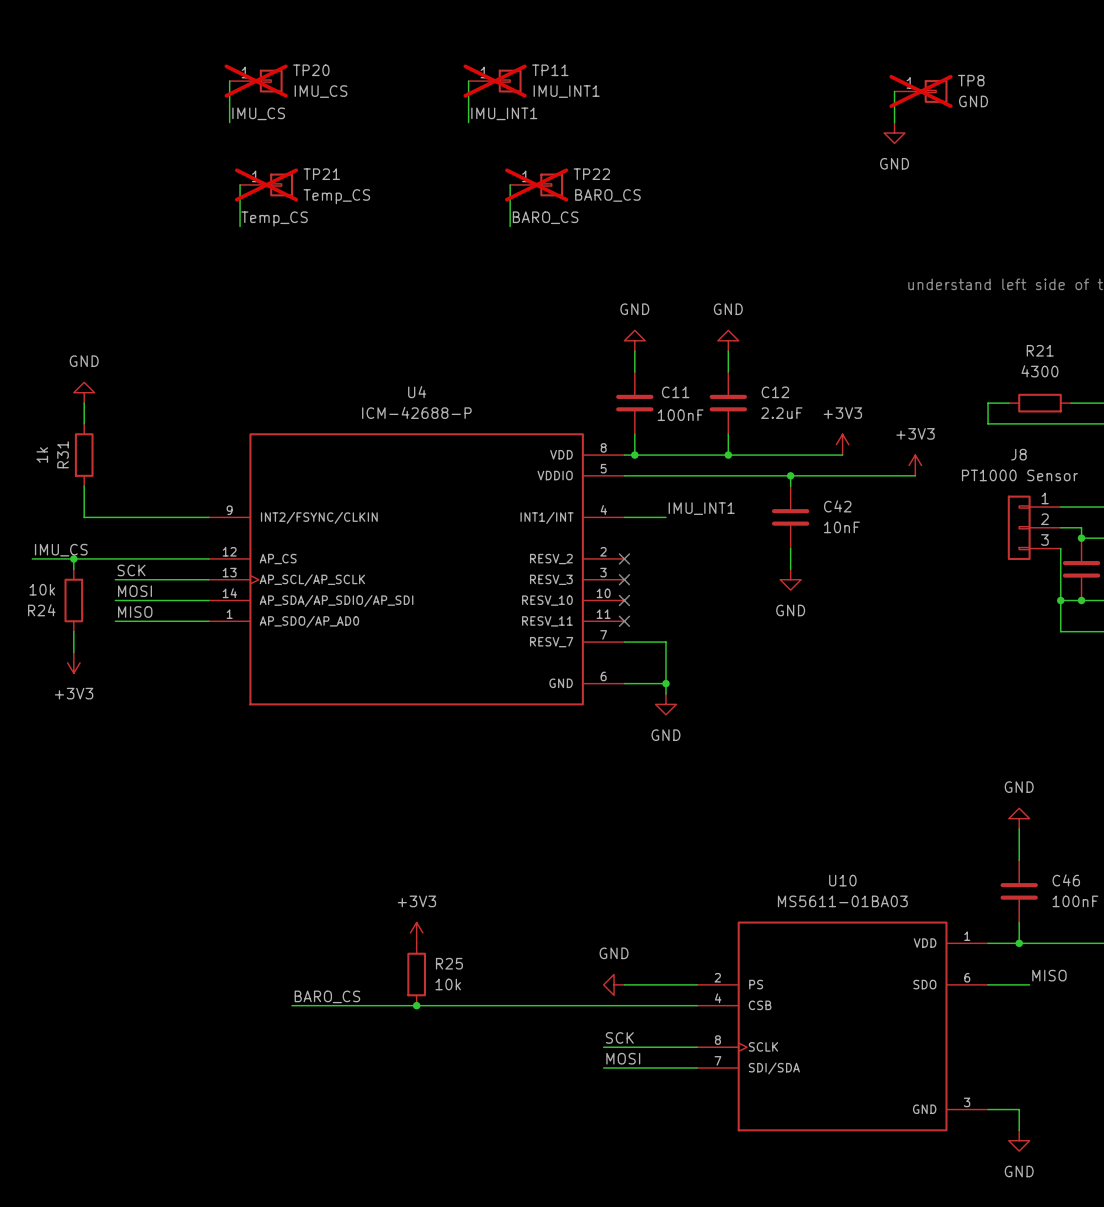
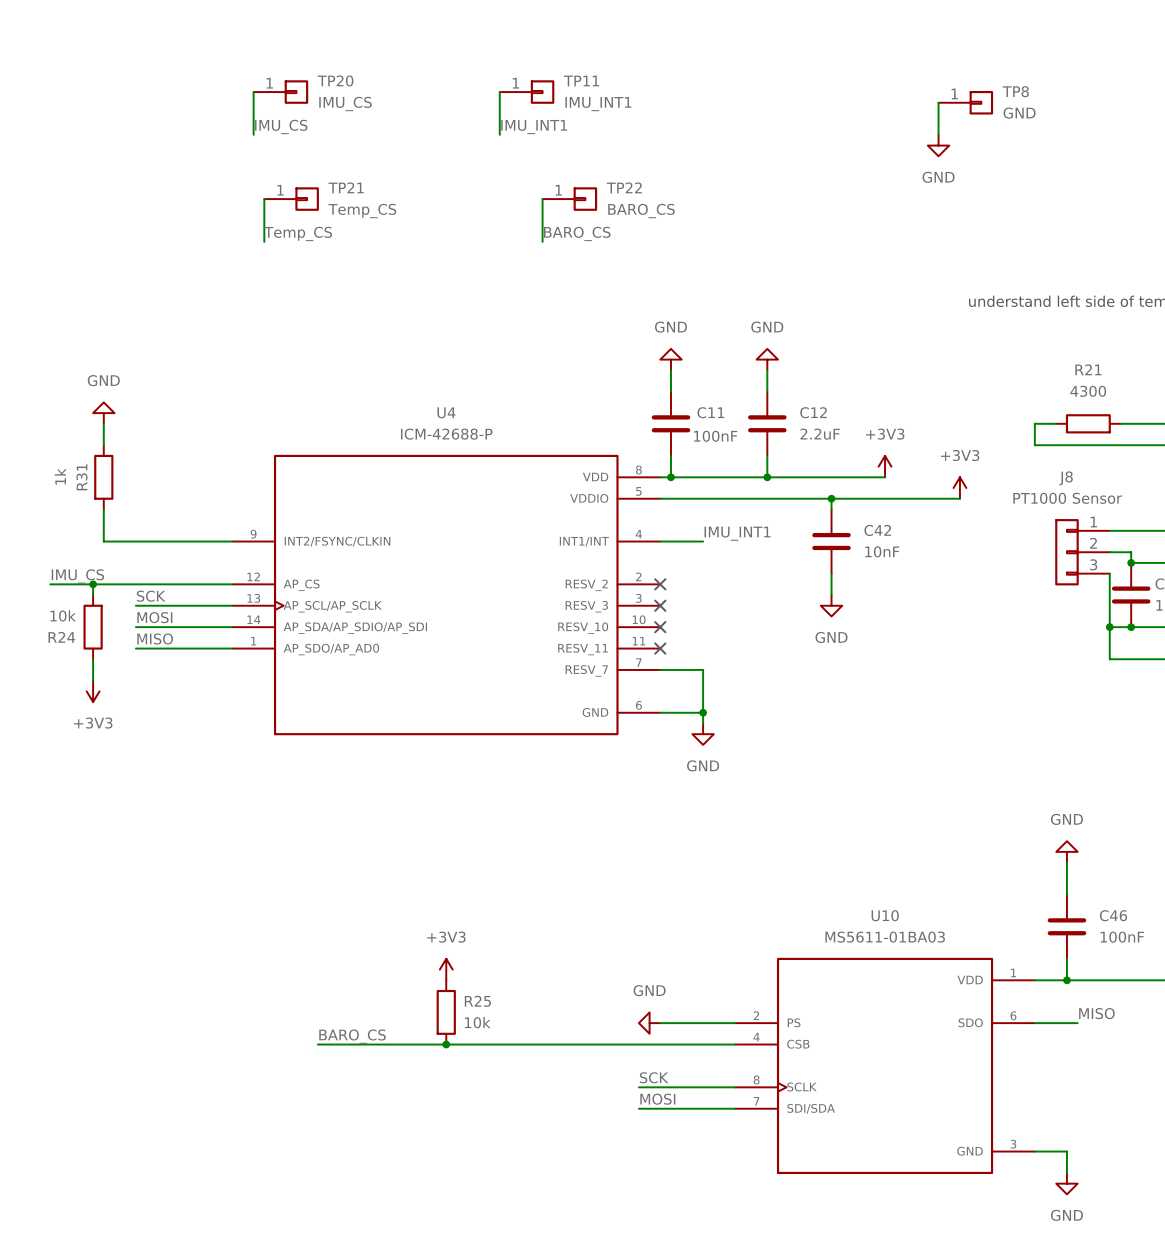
TP20 do-not-place cross: (256, 81) -> none
TP11 do-not-place cross: (495, 81) -> none
TP8 do-not-place cross: (921, 91) -> none
TP21 do-not-place cross: (266, 184) -> none
TP22 do-not-place cross: (536, 184) -> none

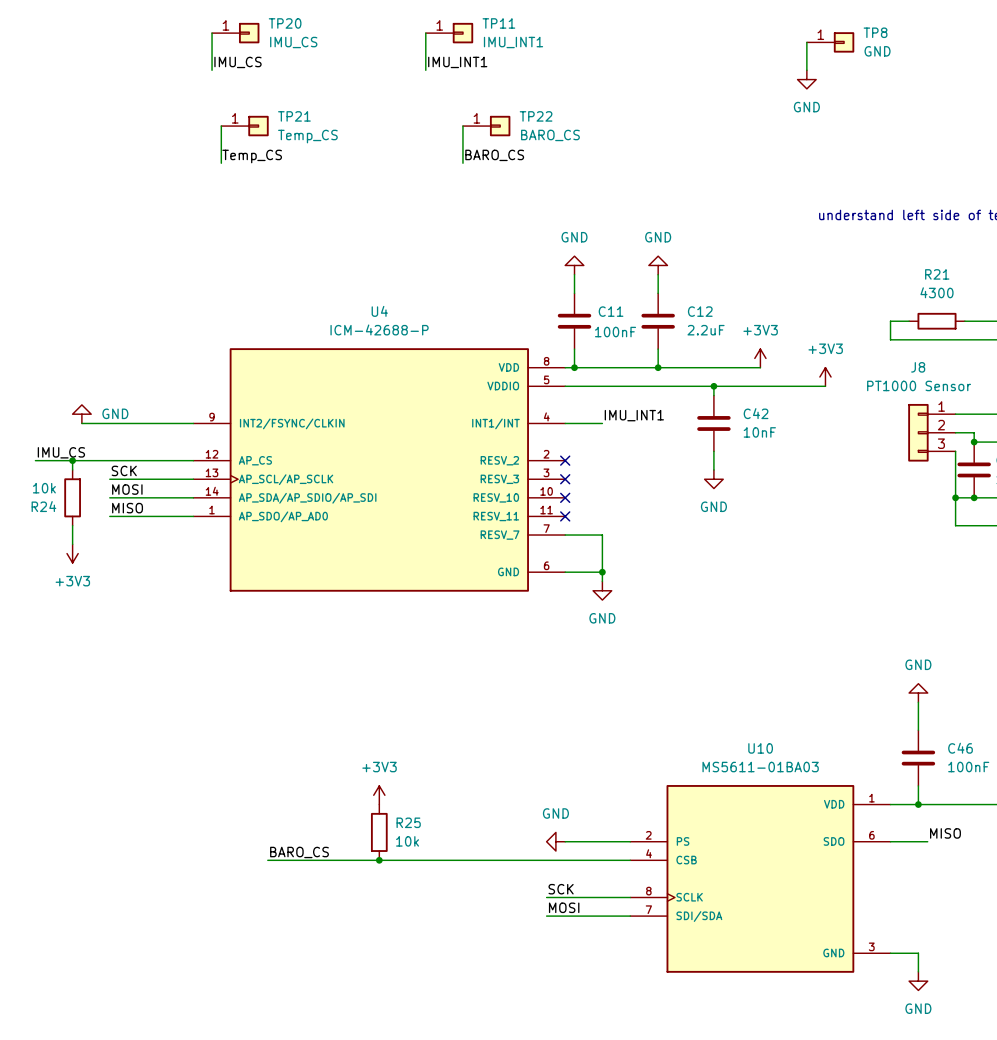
power symbol text position: GND (103, 380) -> GND (115, 413)
power symbol position: GND (103, 413) -> GND (81, 414)
wire: (103, 423) (103, 445) -> none
R31: 1k (103, 477) -> none
wire: (103, 509) (103, 541) -> none

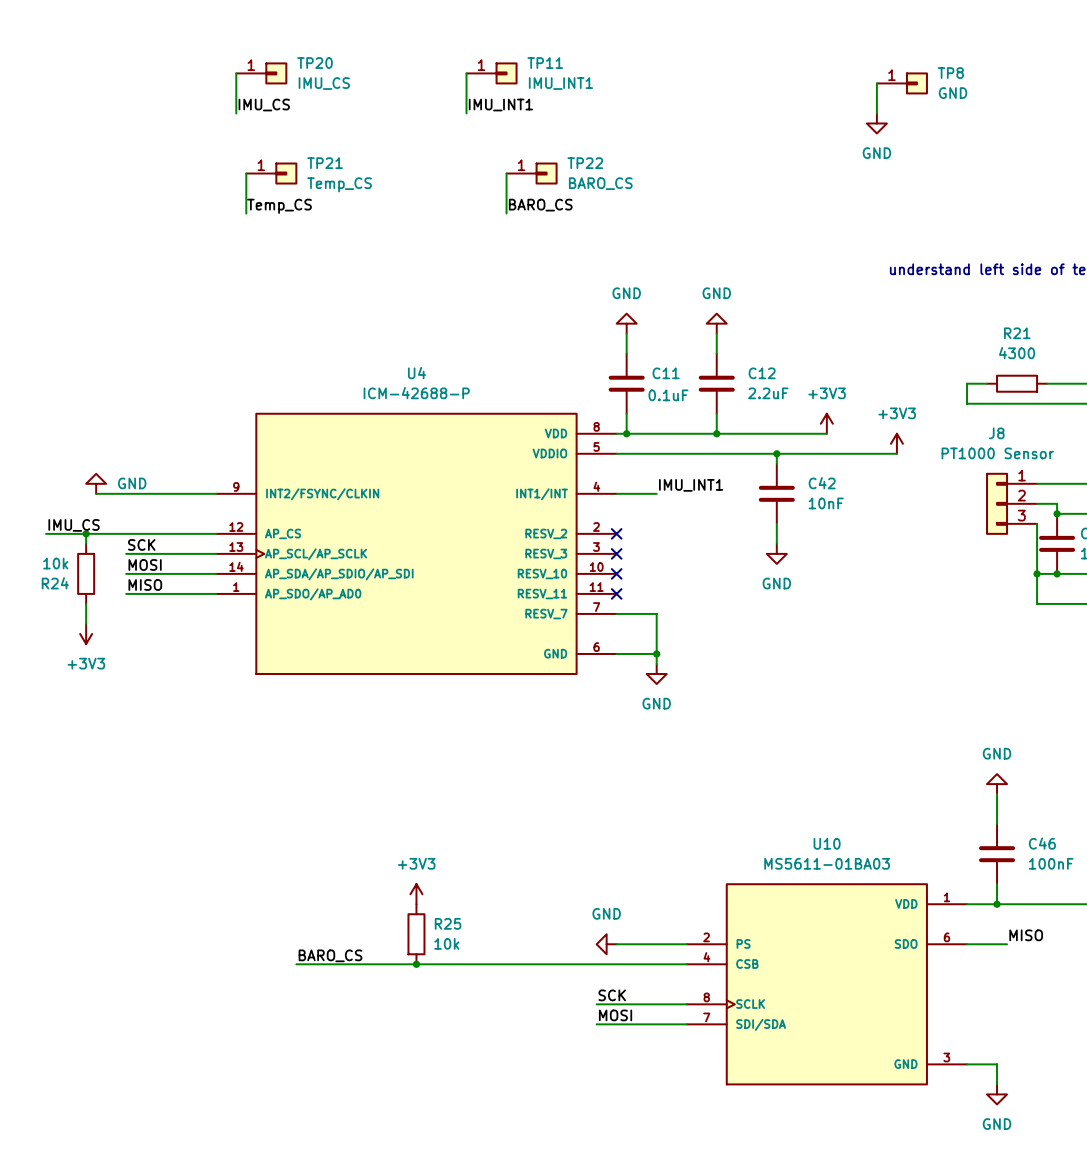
C11 value: 100nF (615, 332) -> 0.1uF (668, 395)

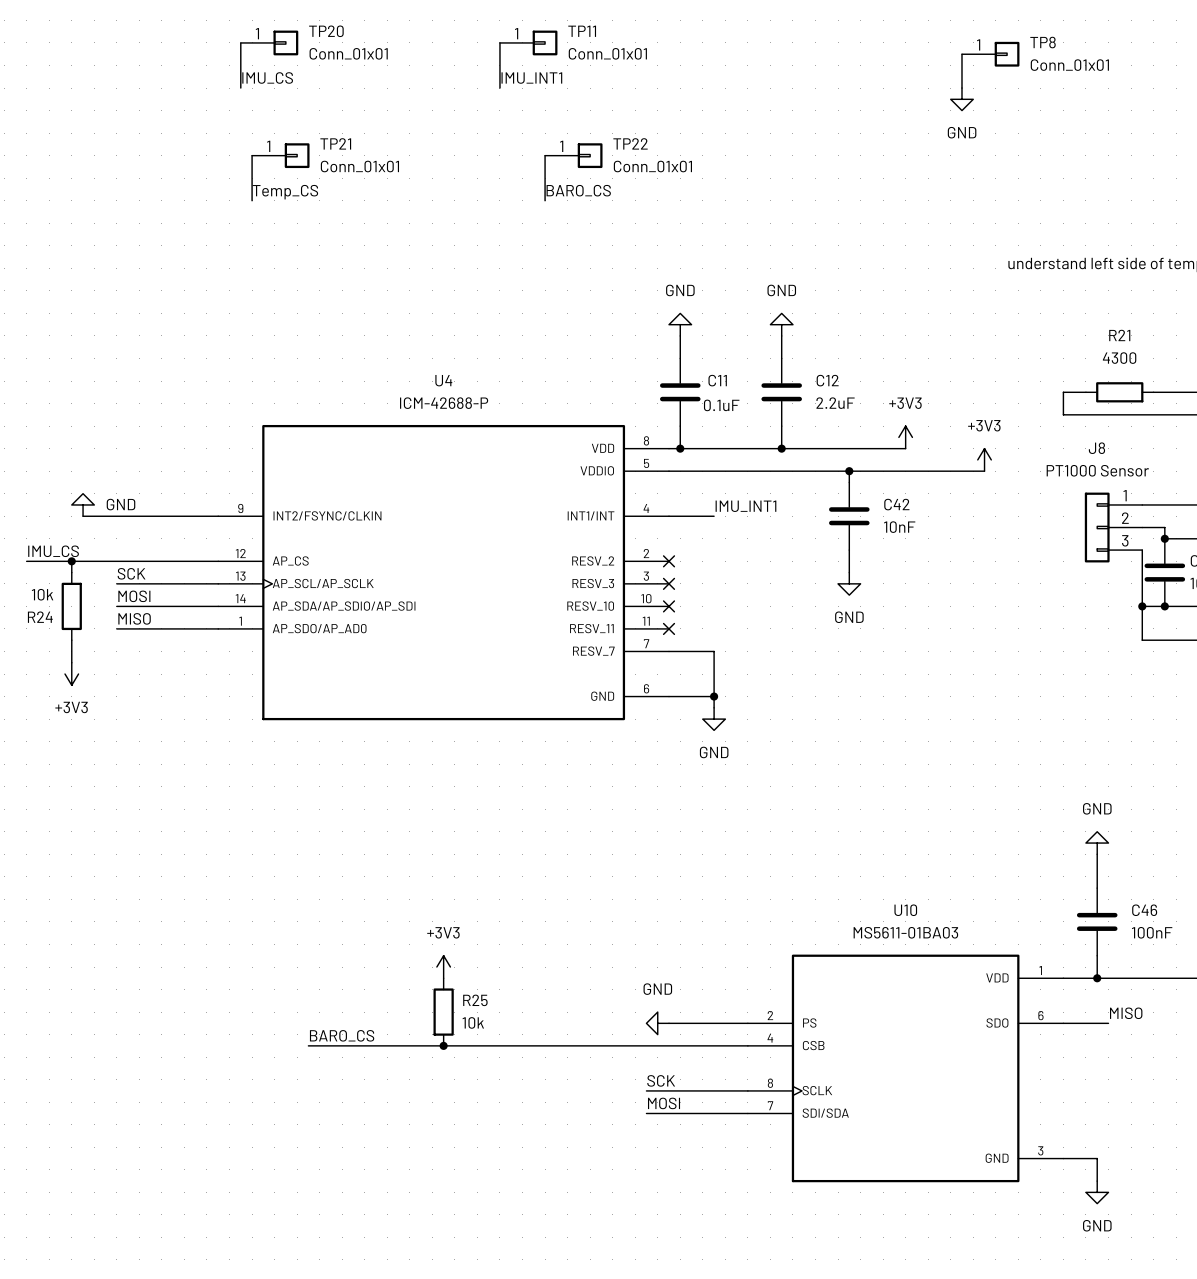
TP20 value: IMU_CS (324, 83) -> Conn_01x01 (348, 53)
TP11 value: IMU_INT1 (560, 83) -> Conn_01x01 (607, 53)
TP8 value: GND (953, 93) -> Conn_01x01 (1069, 65)
TP22 value: BARO_CS (600, 183) -> Conn_01x01 (652, 166)
TP21 value: Temp_CS (339, 184) -> Conn_01x01 (359, 166)

